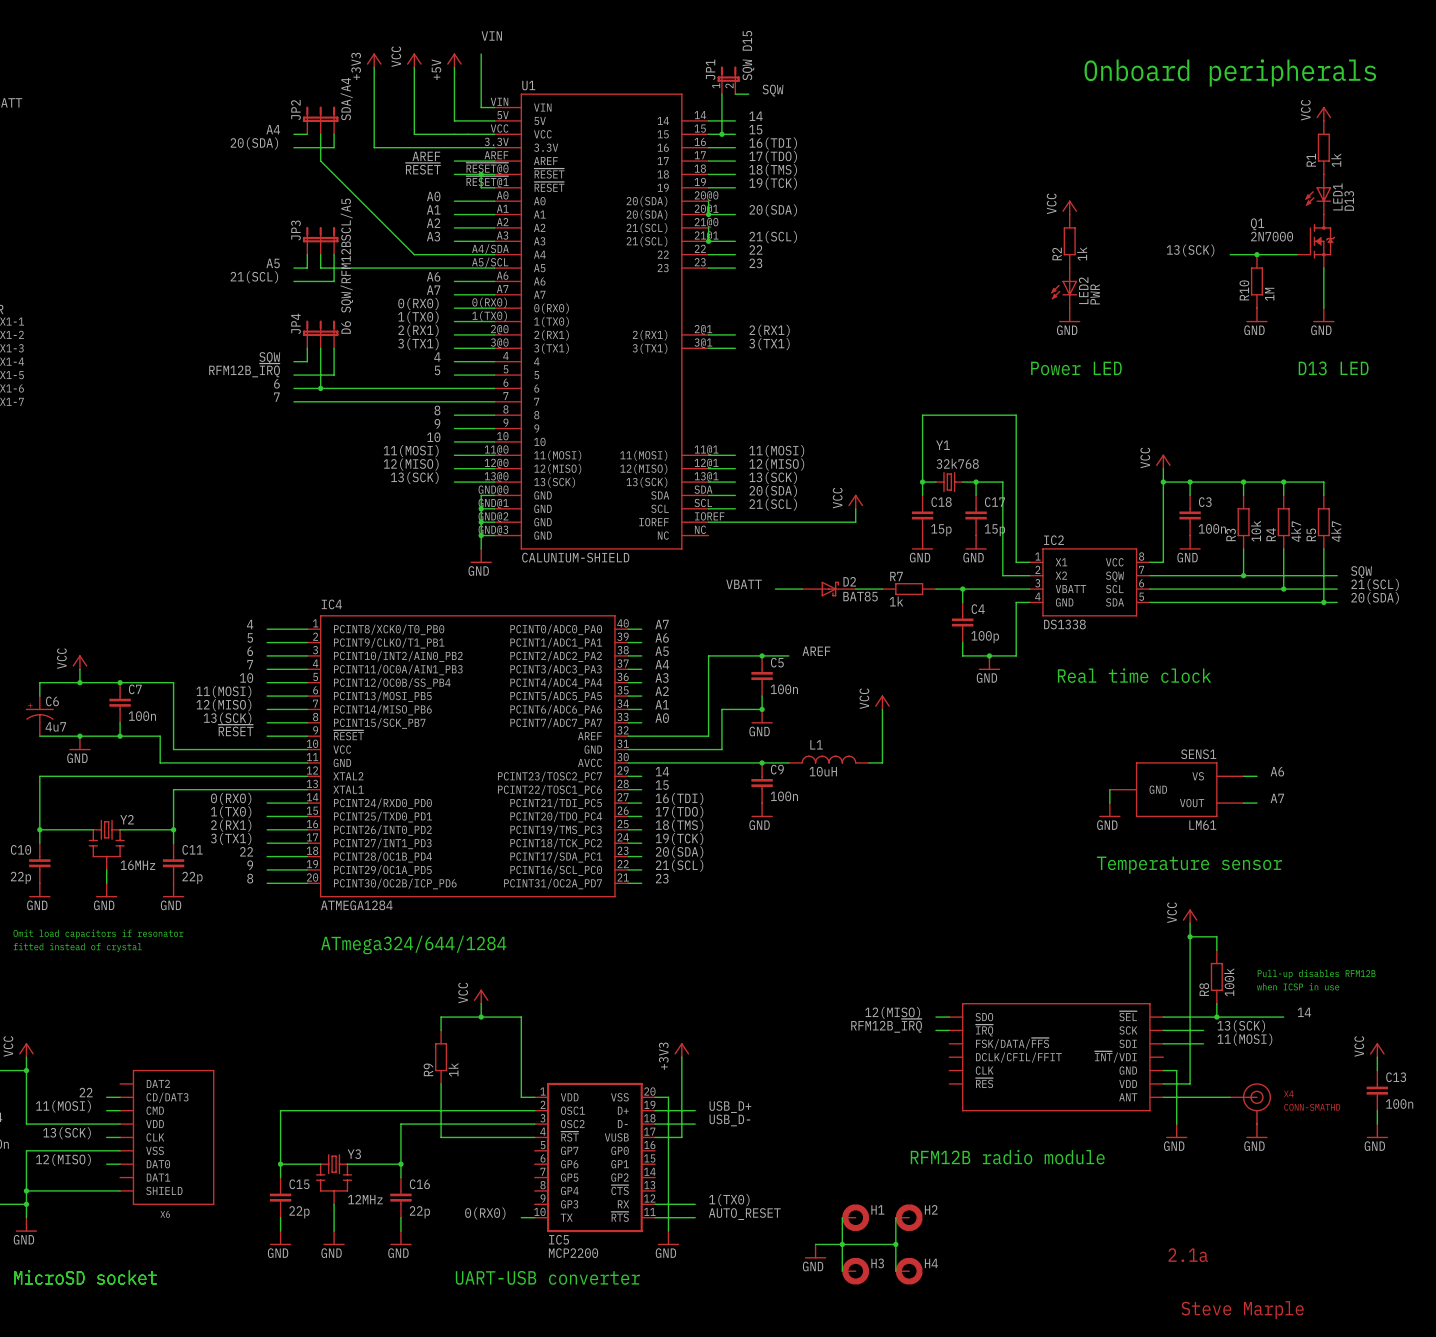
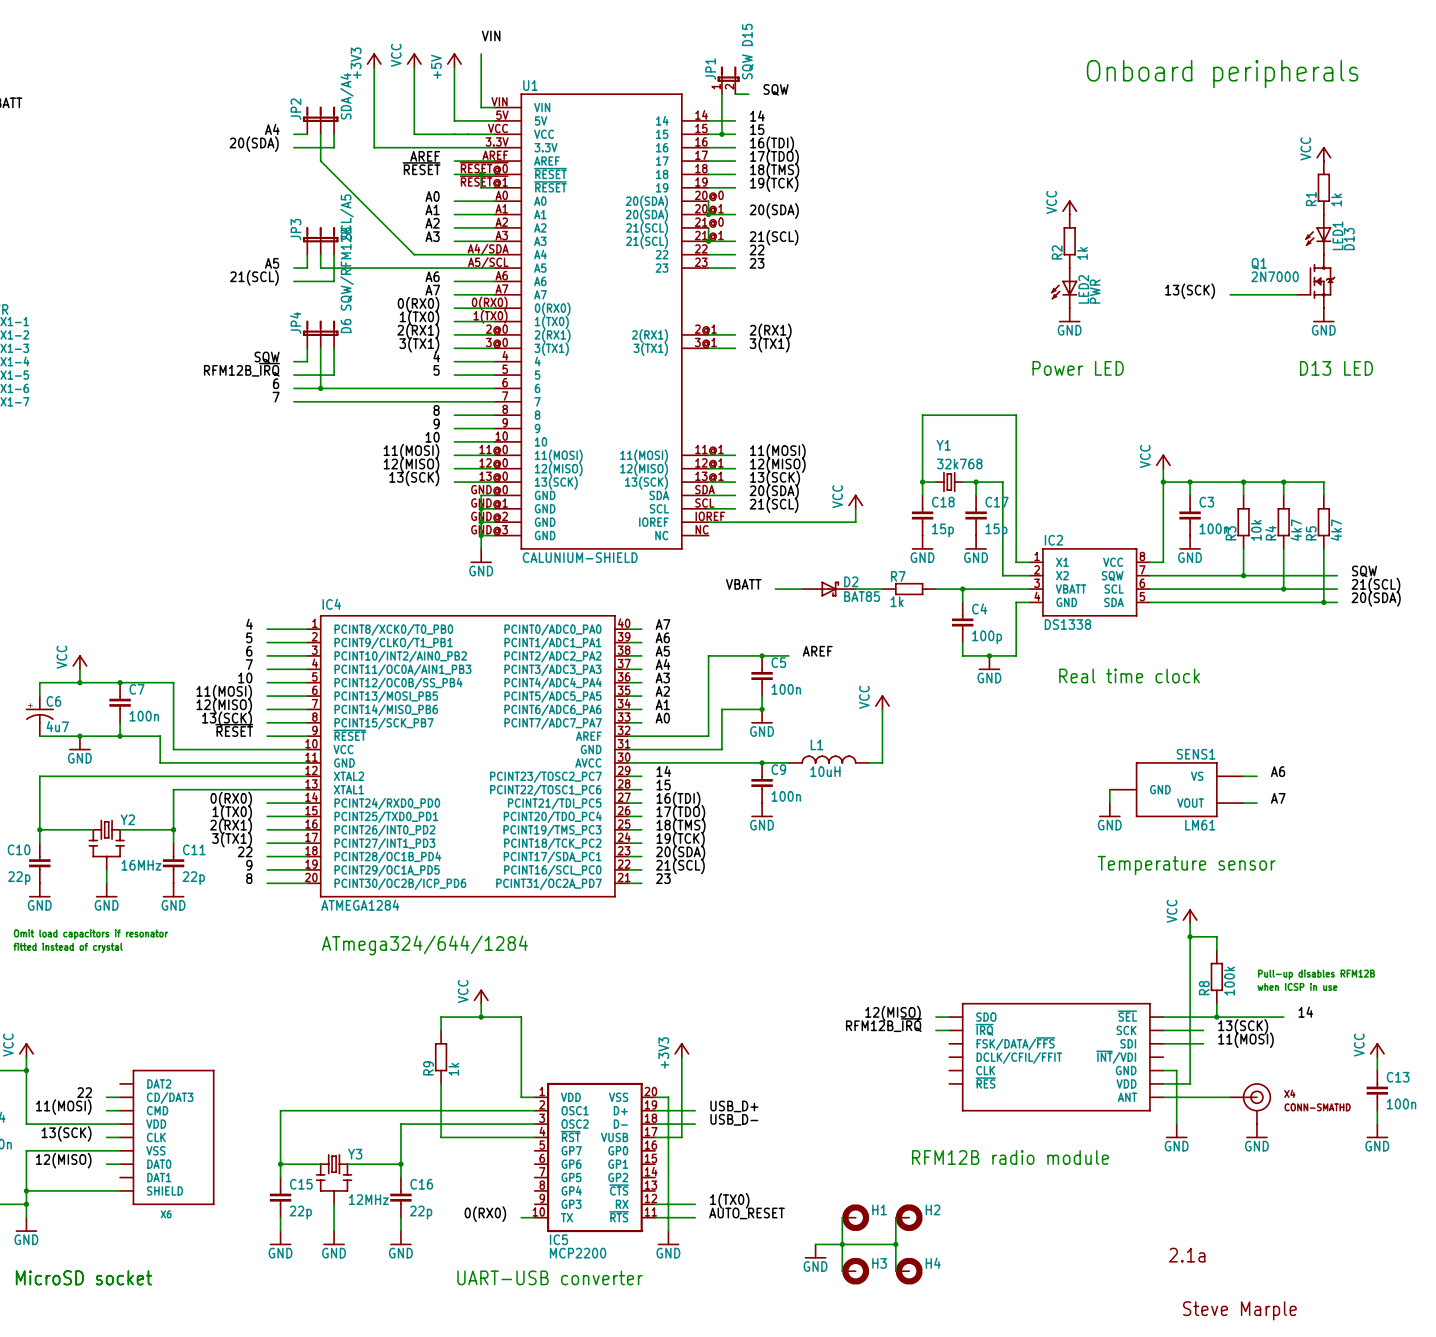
power symbol position: VCC (1323, 113) -> VCC (1323, 154)
R1 position: (1323, 147) -> (1323, 187)
LED1 position: (1318, 194) -> (1318, 234)
Q1 position: (1316, 241) -> (1316, 281)
label position: 13(SCK) (1190, 250) -> 13(SCK) (1190, 291)
wire: (1230, 254) (1297, 254) -> (1230, 294) (1297, 294)
junction: (1256, 254) -> none
R10: 1M (1256, 281) -> none
power symbol: GND (1256, 315) -> none

